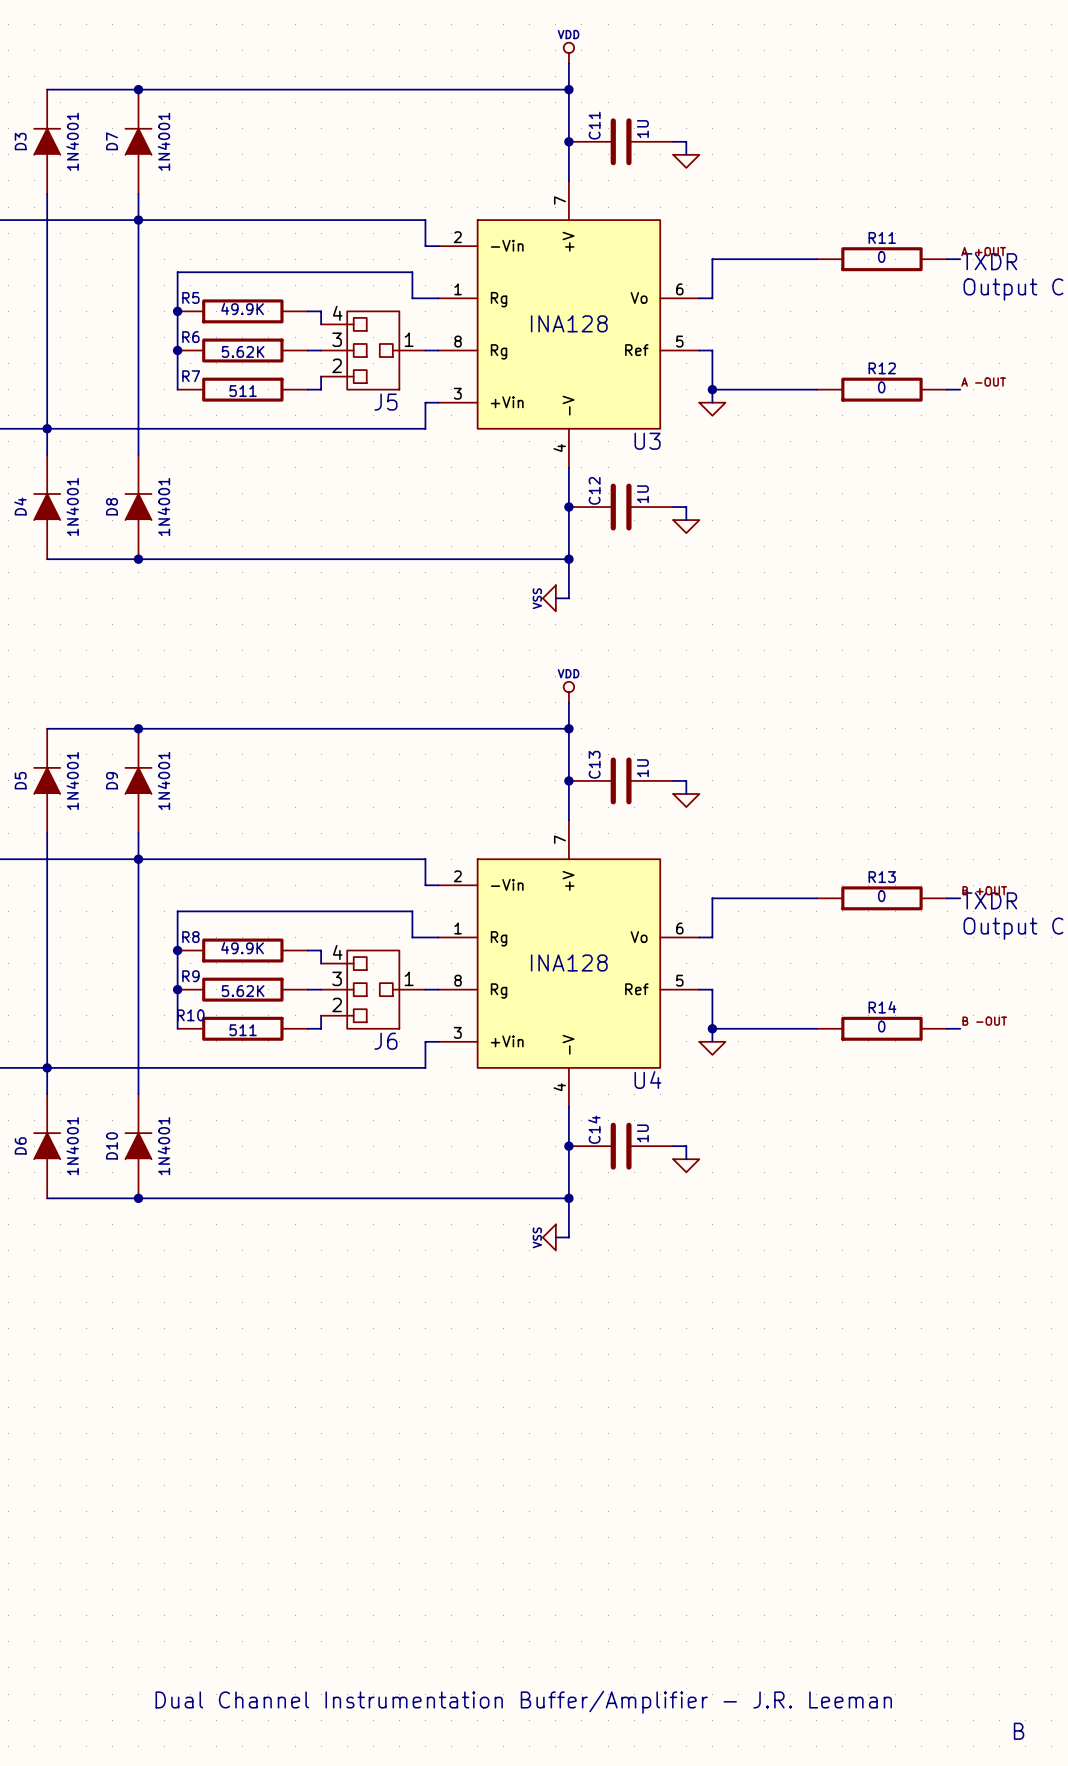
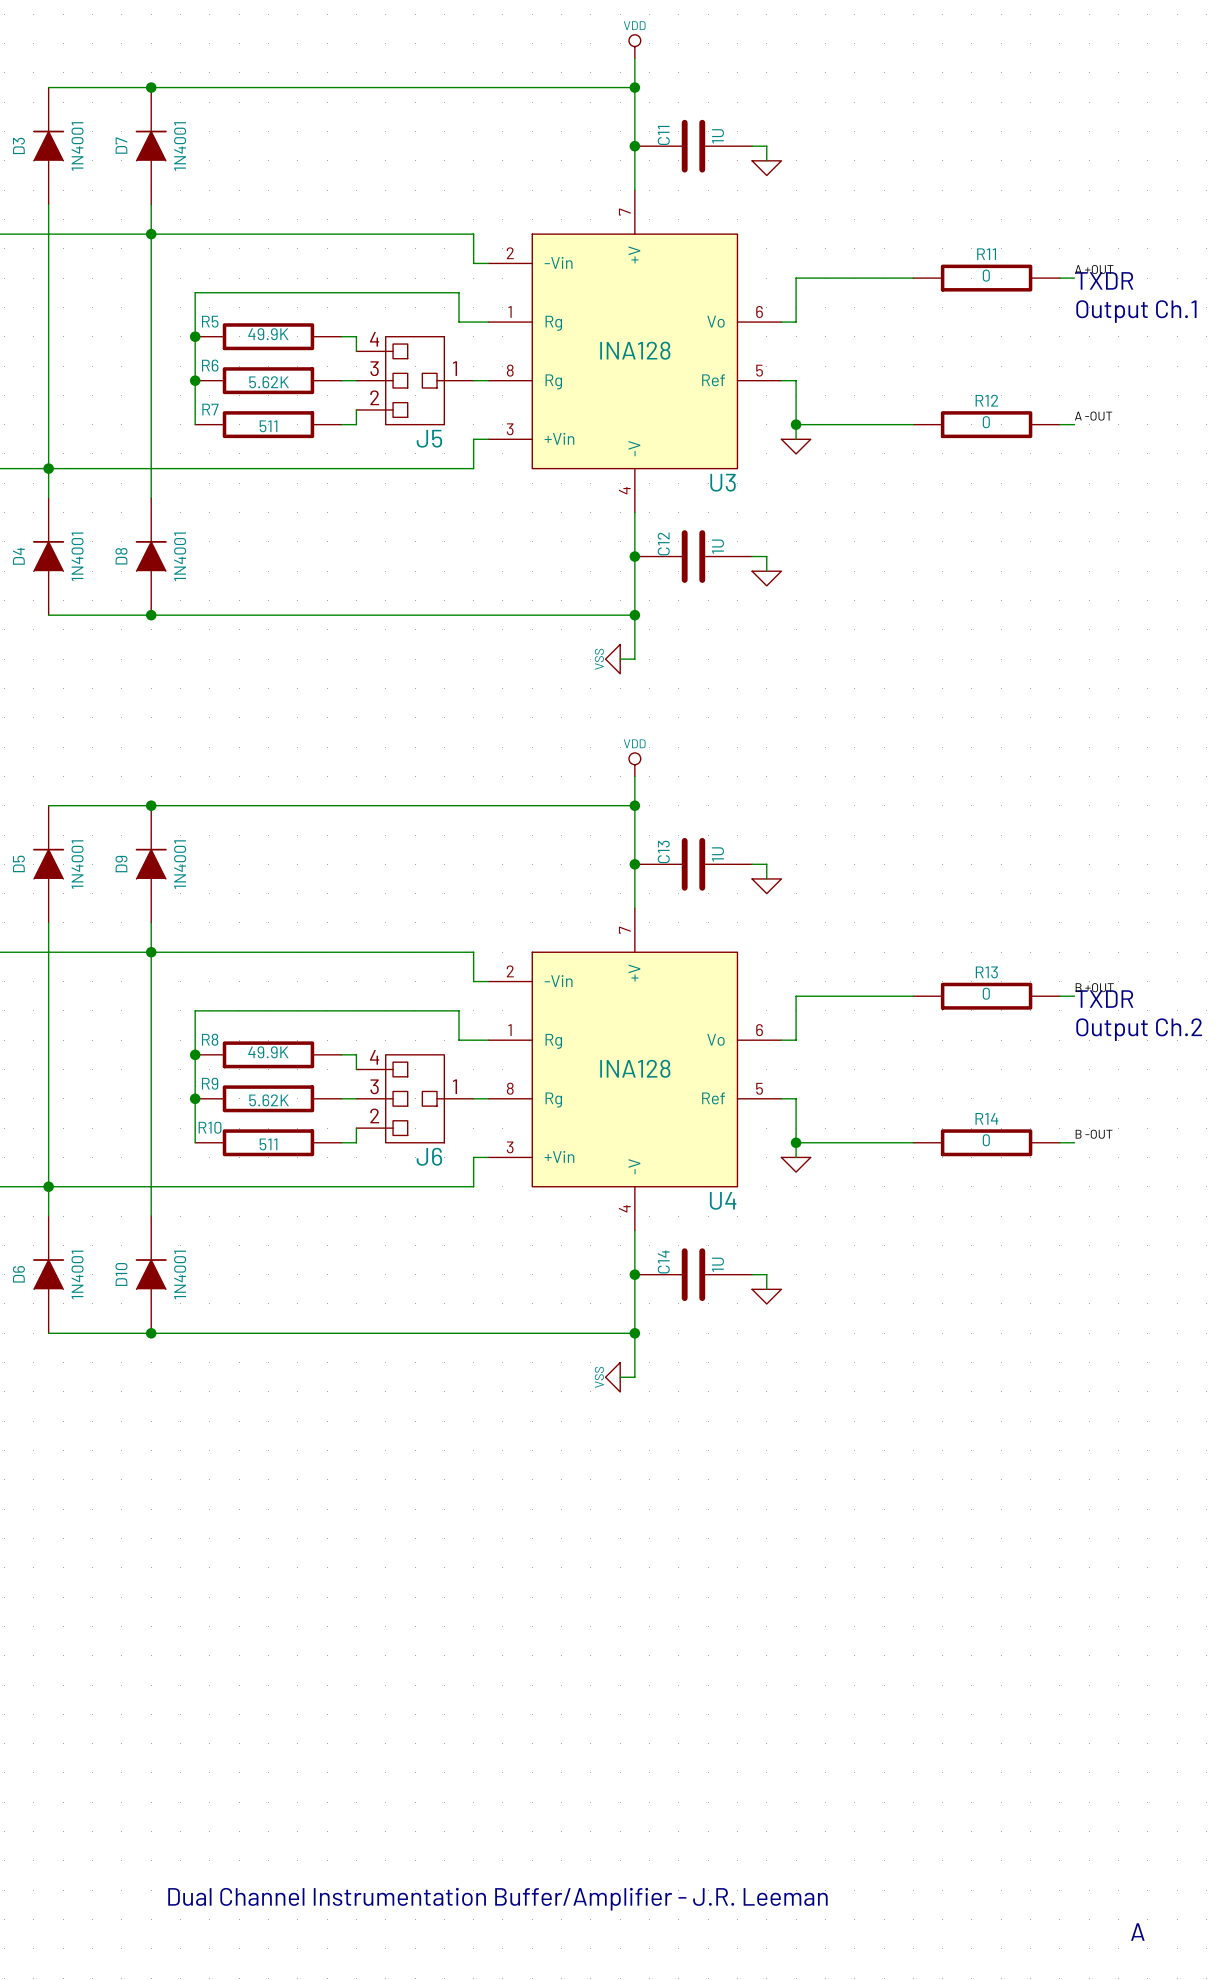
text: B (1019, 1731) -> A (1137, 1932)

